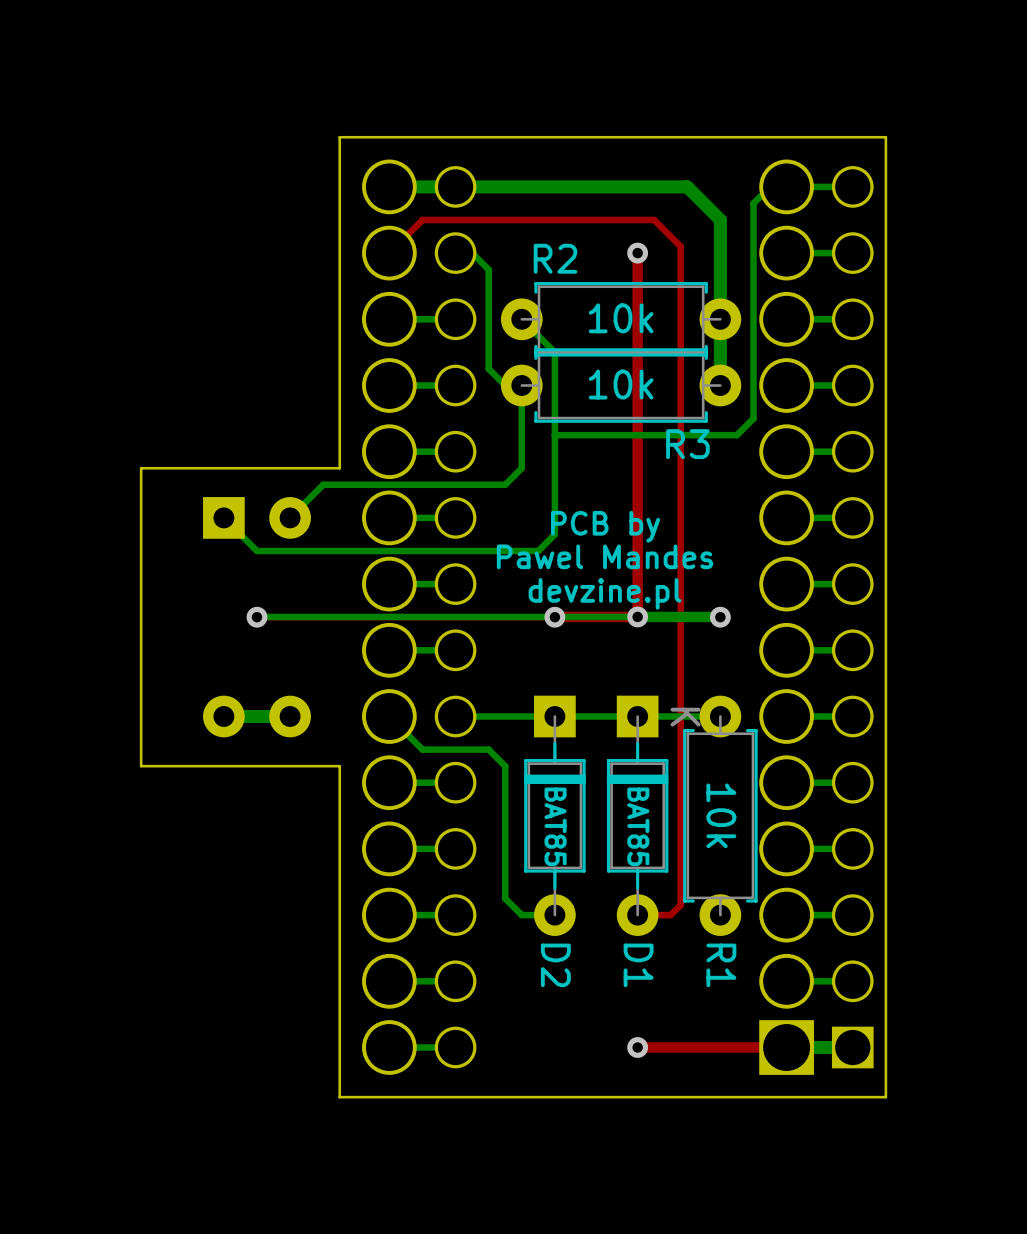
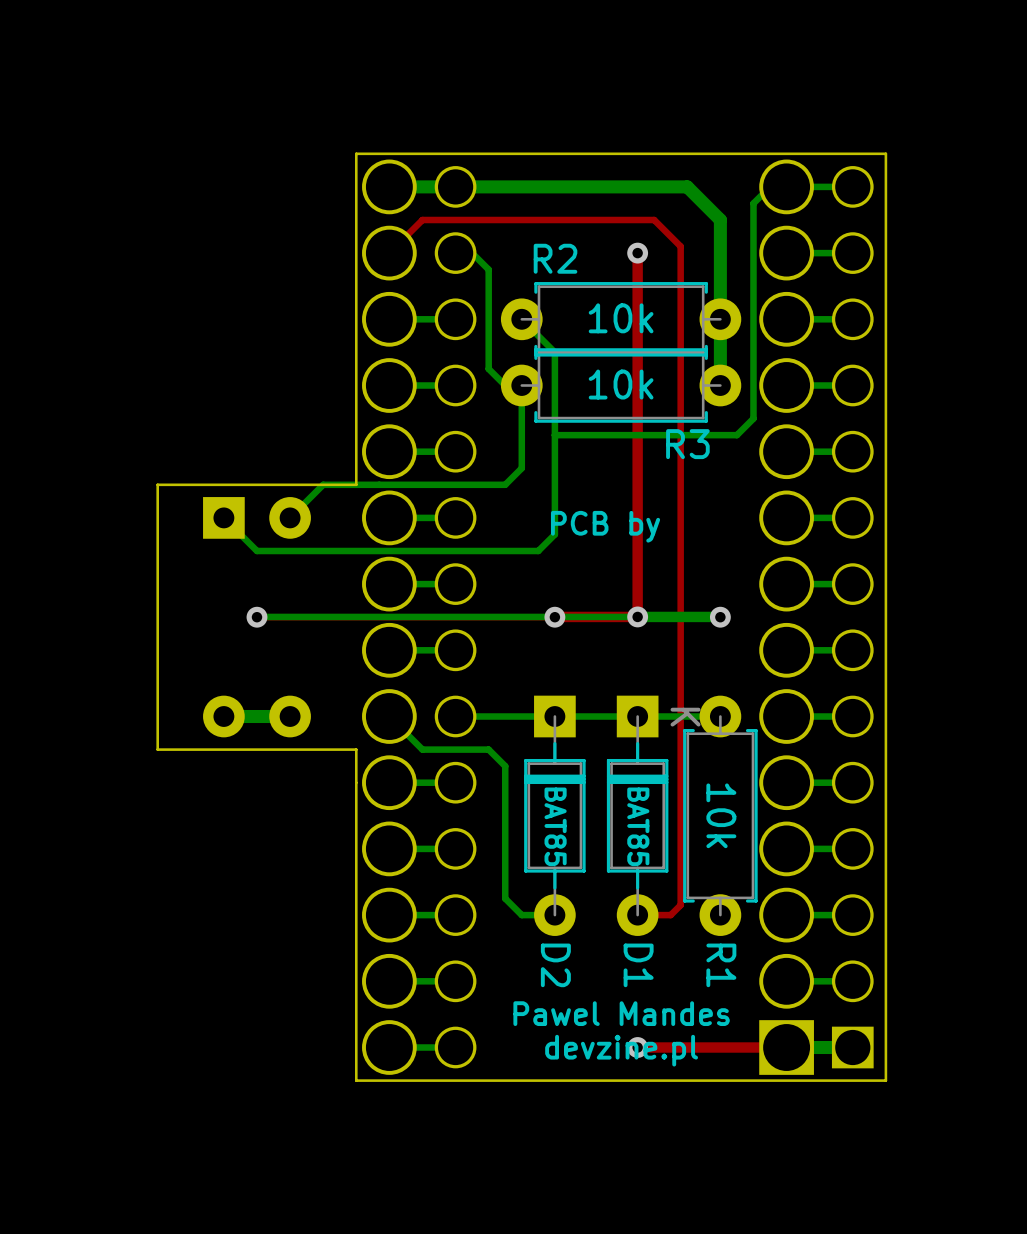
board edge: (885, 153) (885, 137) (339, 137) (339, 468) (141, 468) (141, 766) (339, 766) (339, 1097) (885, 1097) (885, 1080) -> (885, 153) (356, 153) (356, 484) (157, 484) (157, 749) (356, 749) (356, 1080) (885, 1080)
text position: Pawel Mandes (605, 556) -> Pawel Mandes (621, 1013)
text position: devzine.pl (605, 593) -> devzine.pl (621, 1050)

